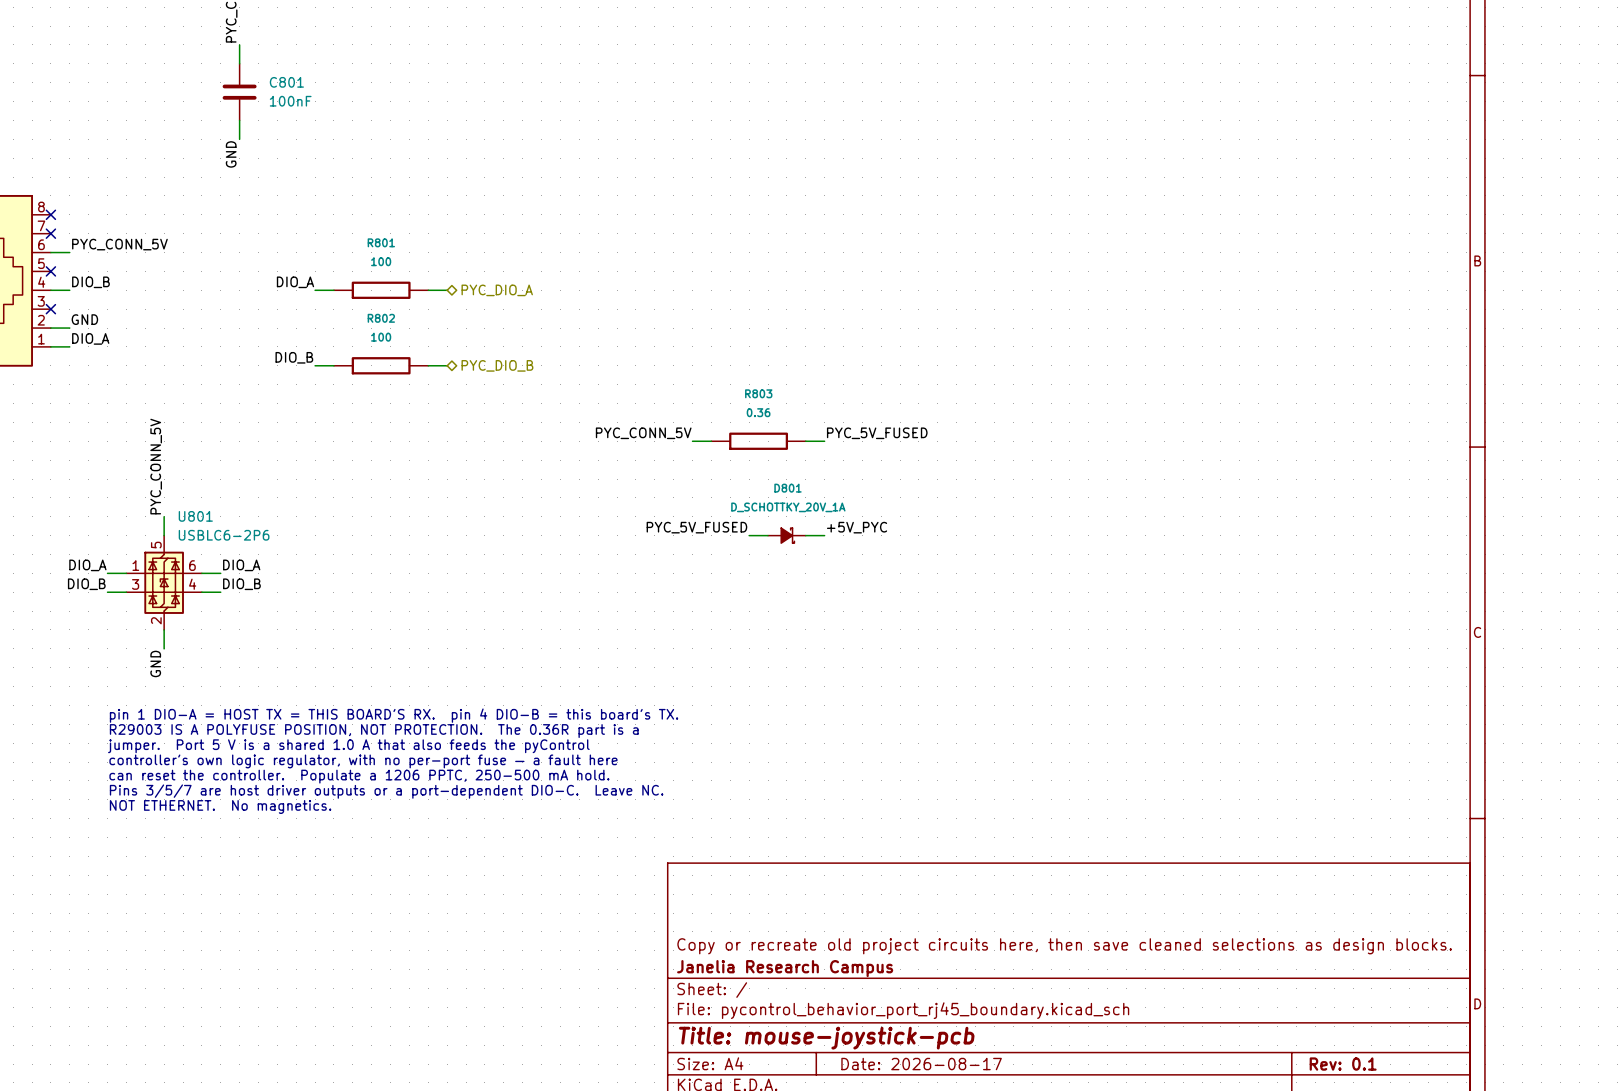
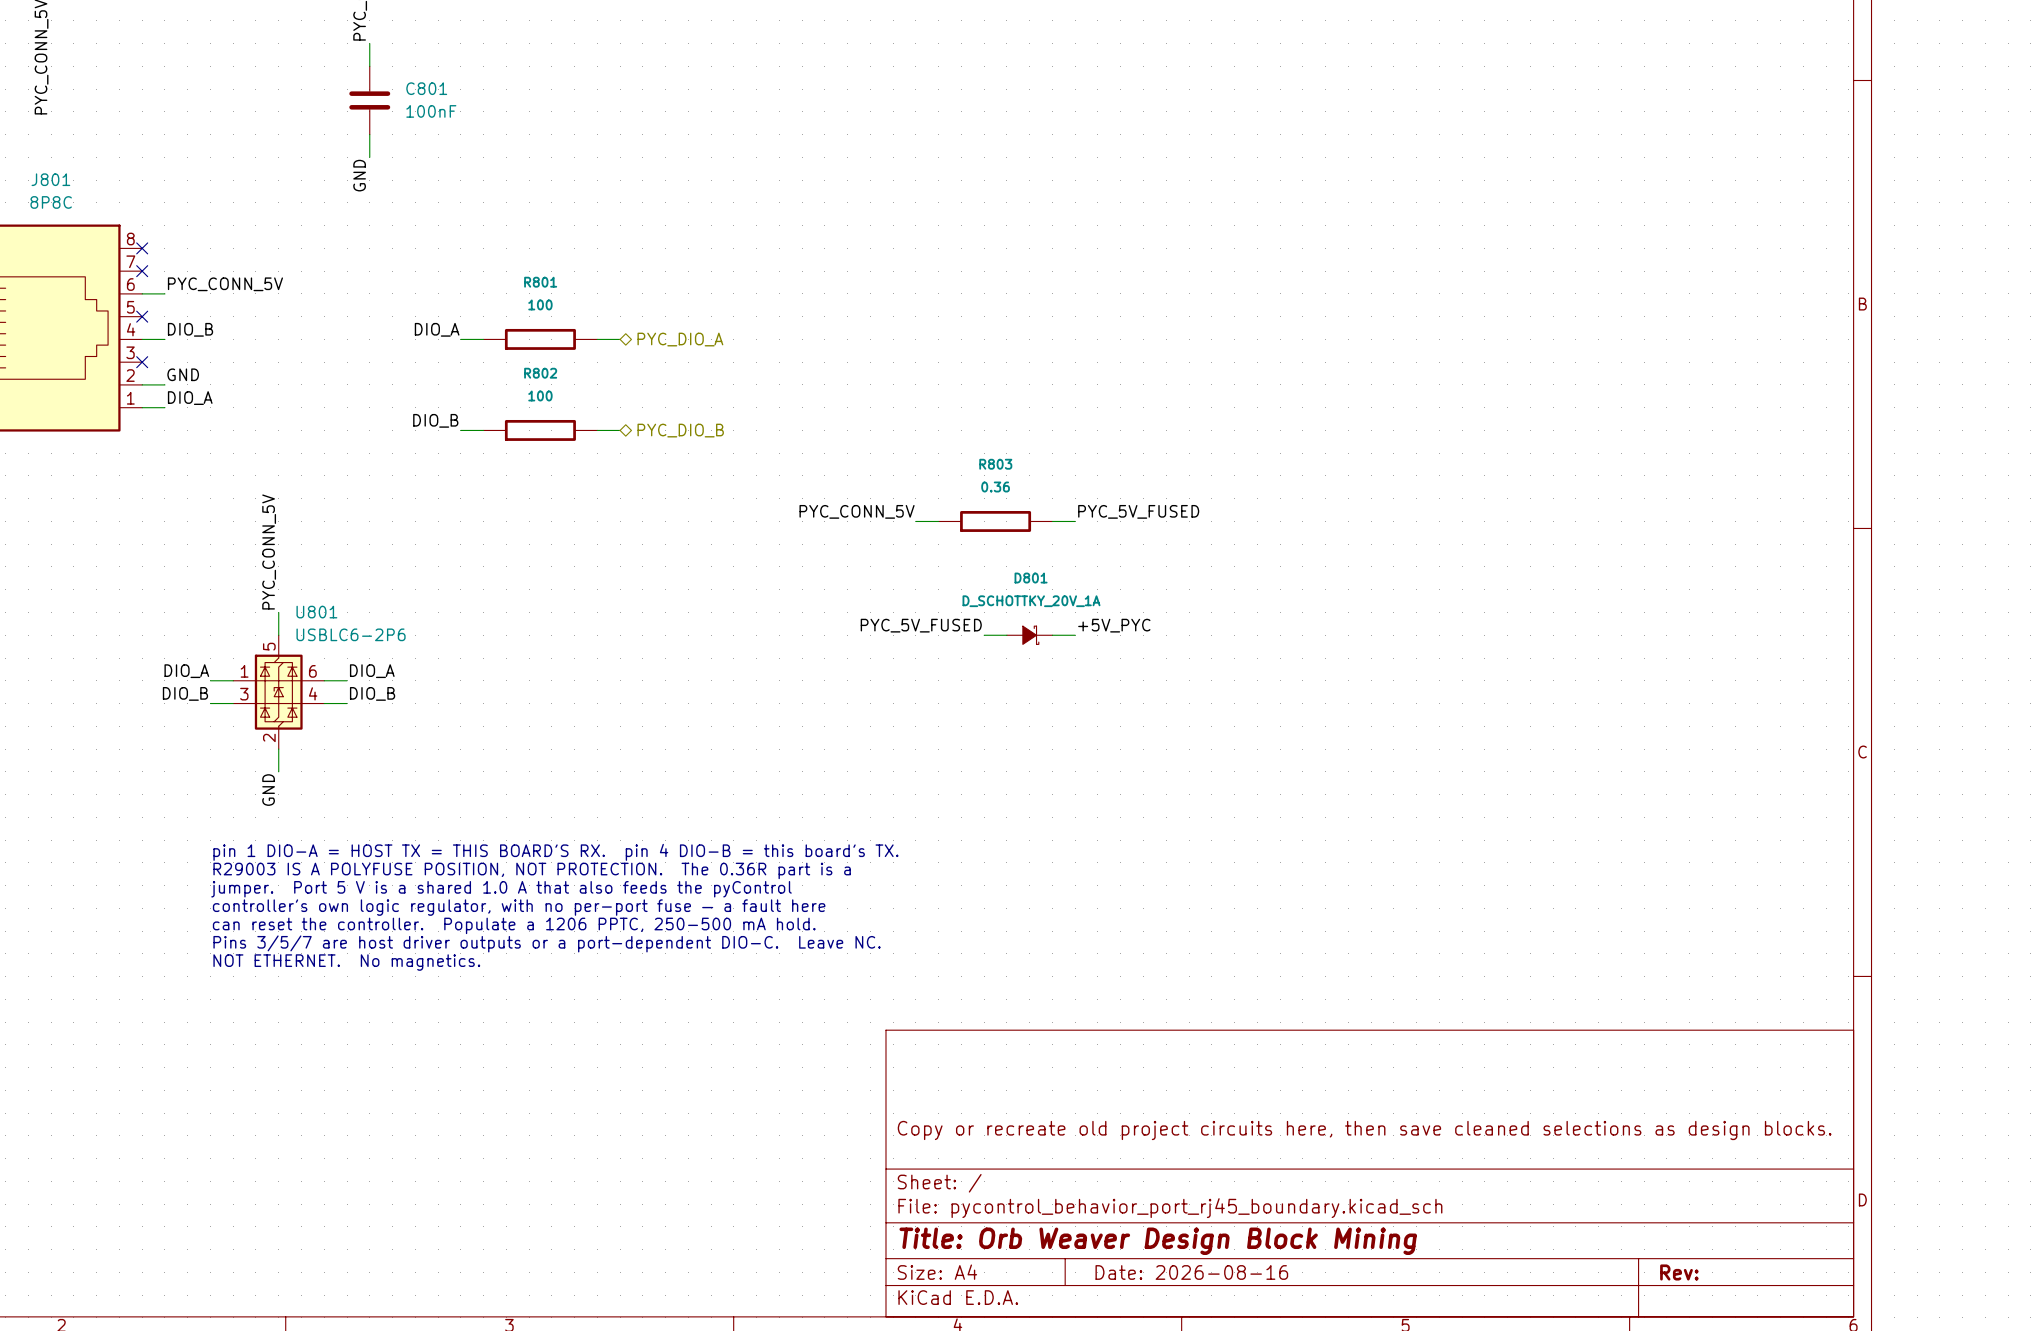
title block: Janelia Research Campus (785, 968) -> none
title block: Title: mouse-joystick-pcb (826, 1038) -> Title: Orb Weaver Design Block Mining (1158, 1241)
title block: Date: 2026-08-17 (921, 1064) -> Date: 2026-08-16 (1191, 1272)
title block: Rev: 0.1 (1343, 1064) -> Rev: (1679, 1272)

